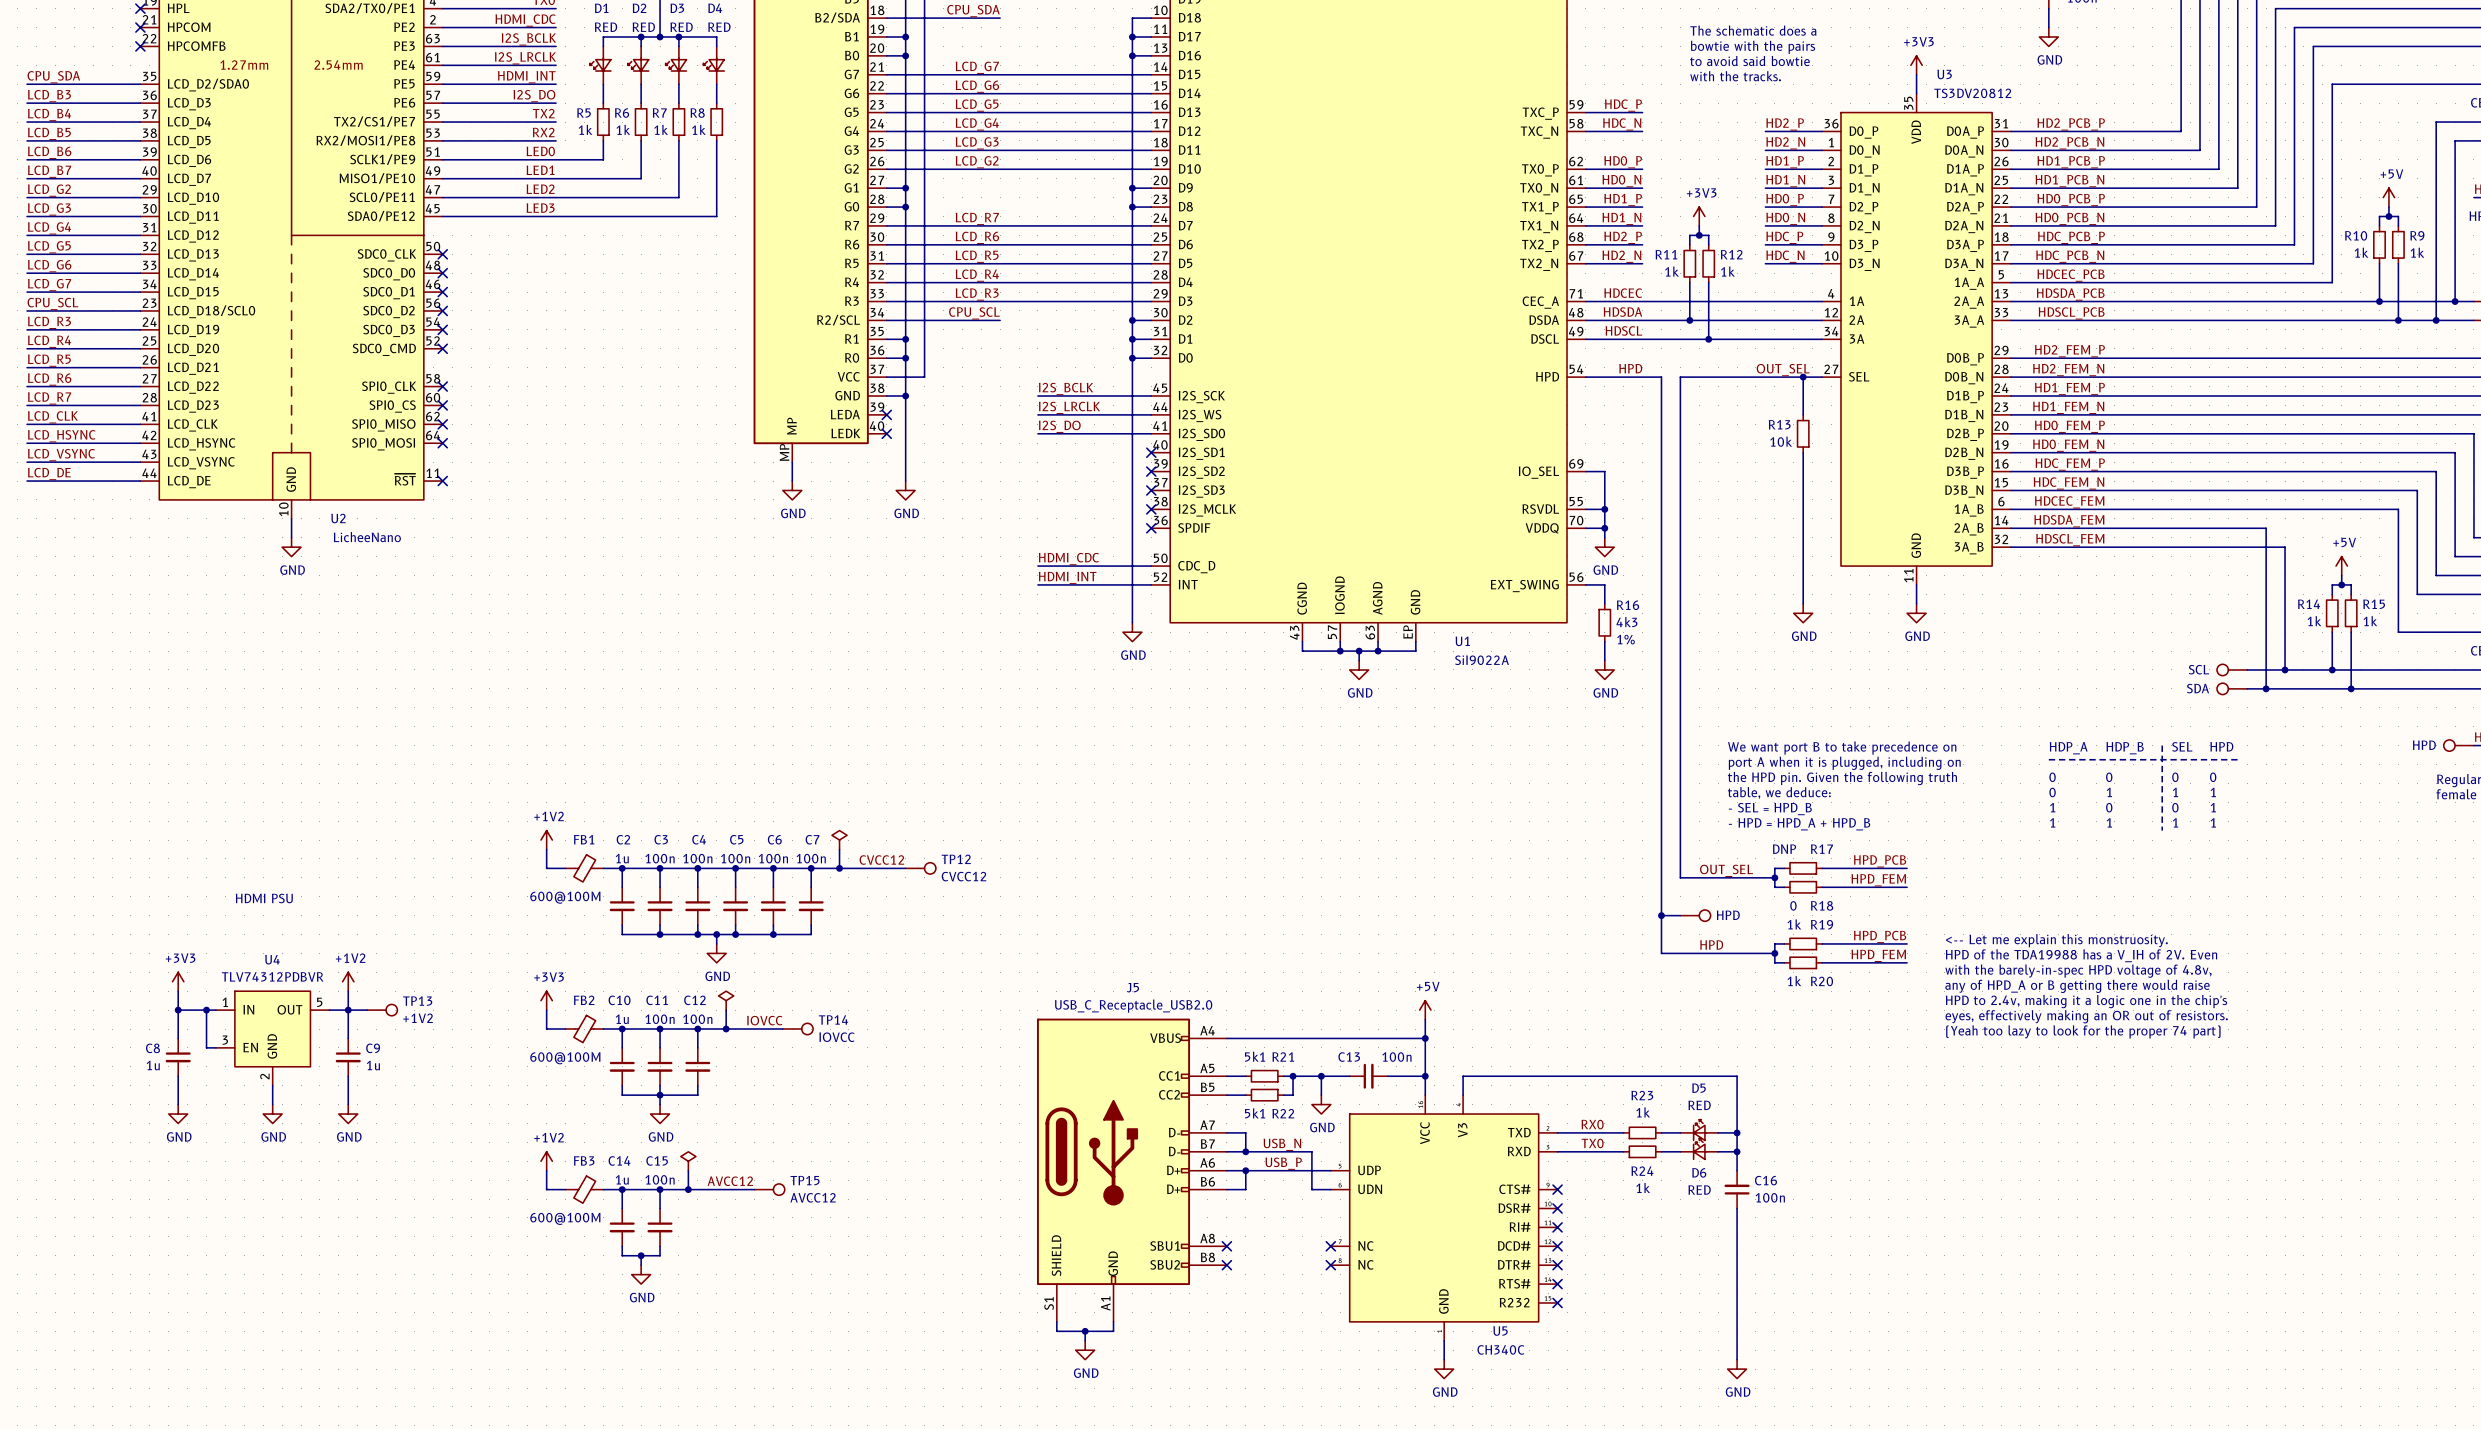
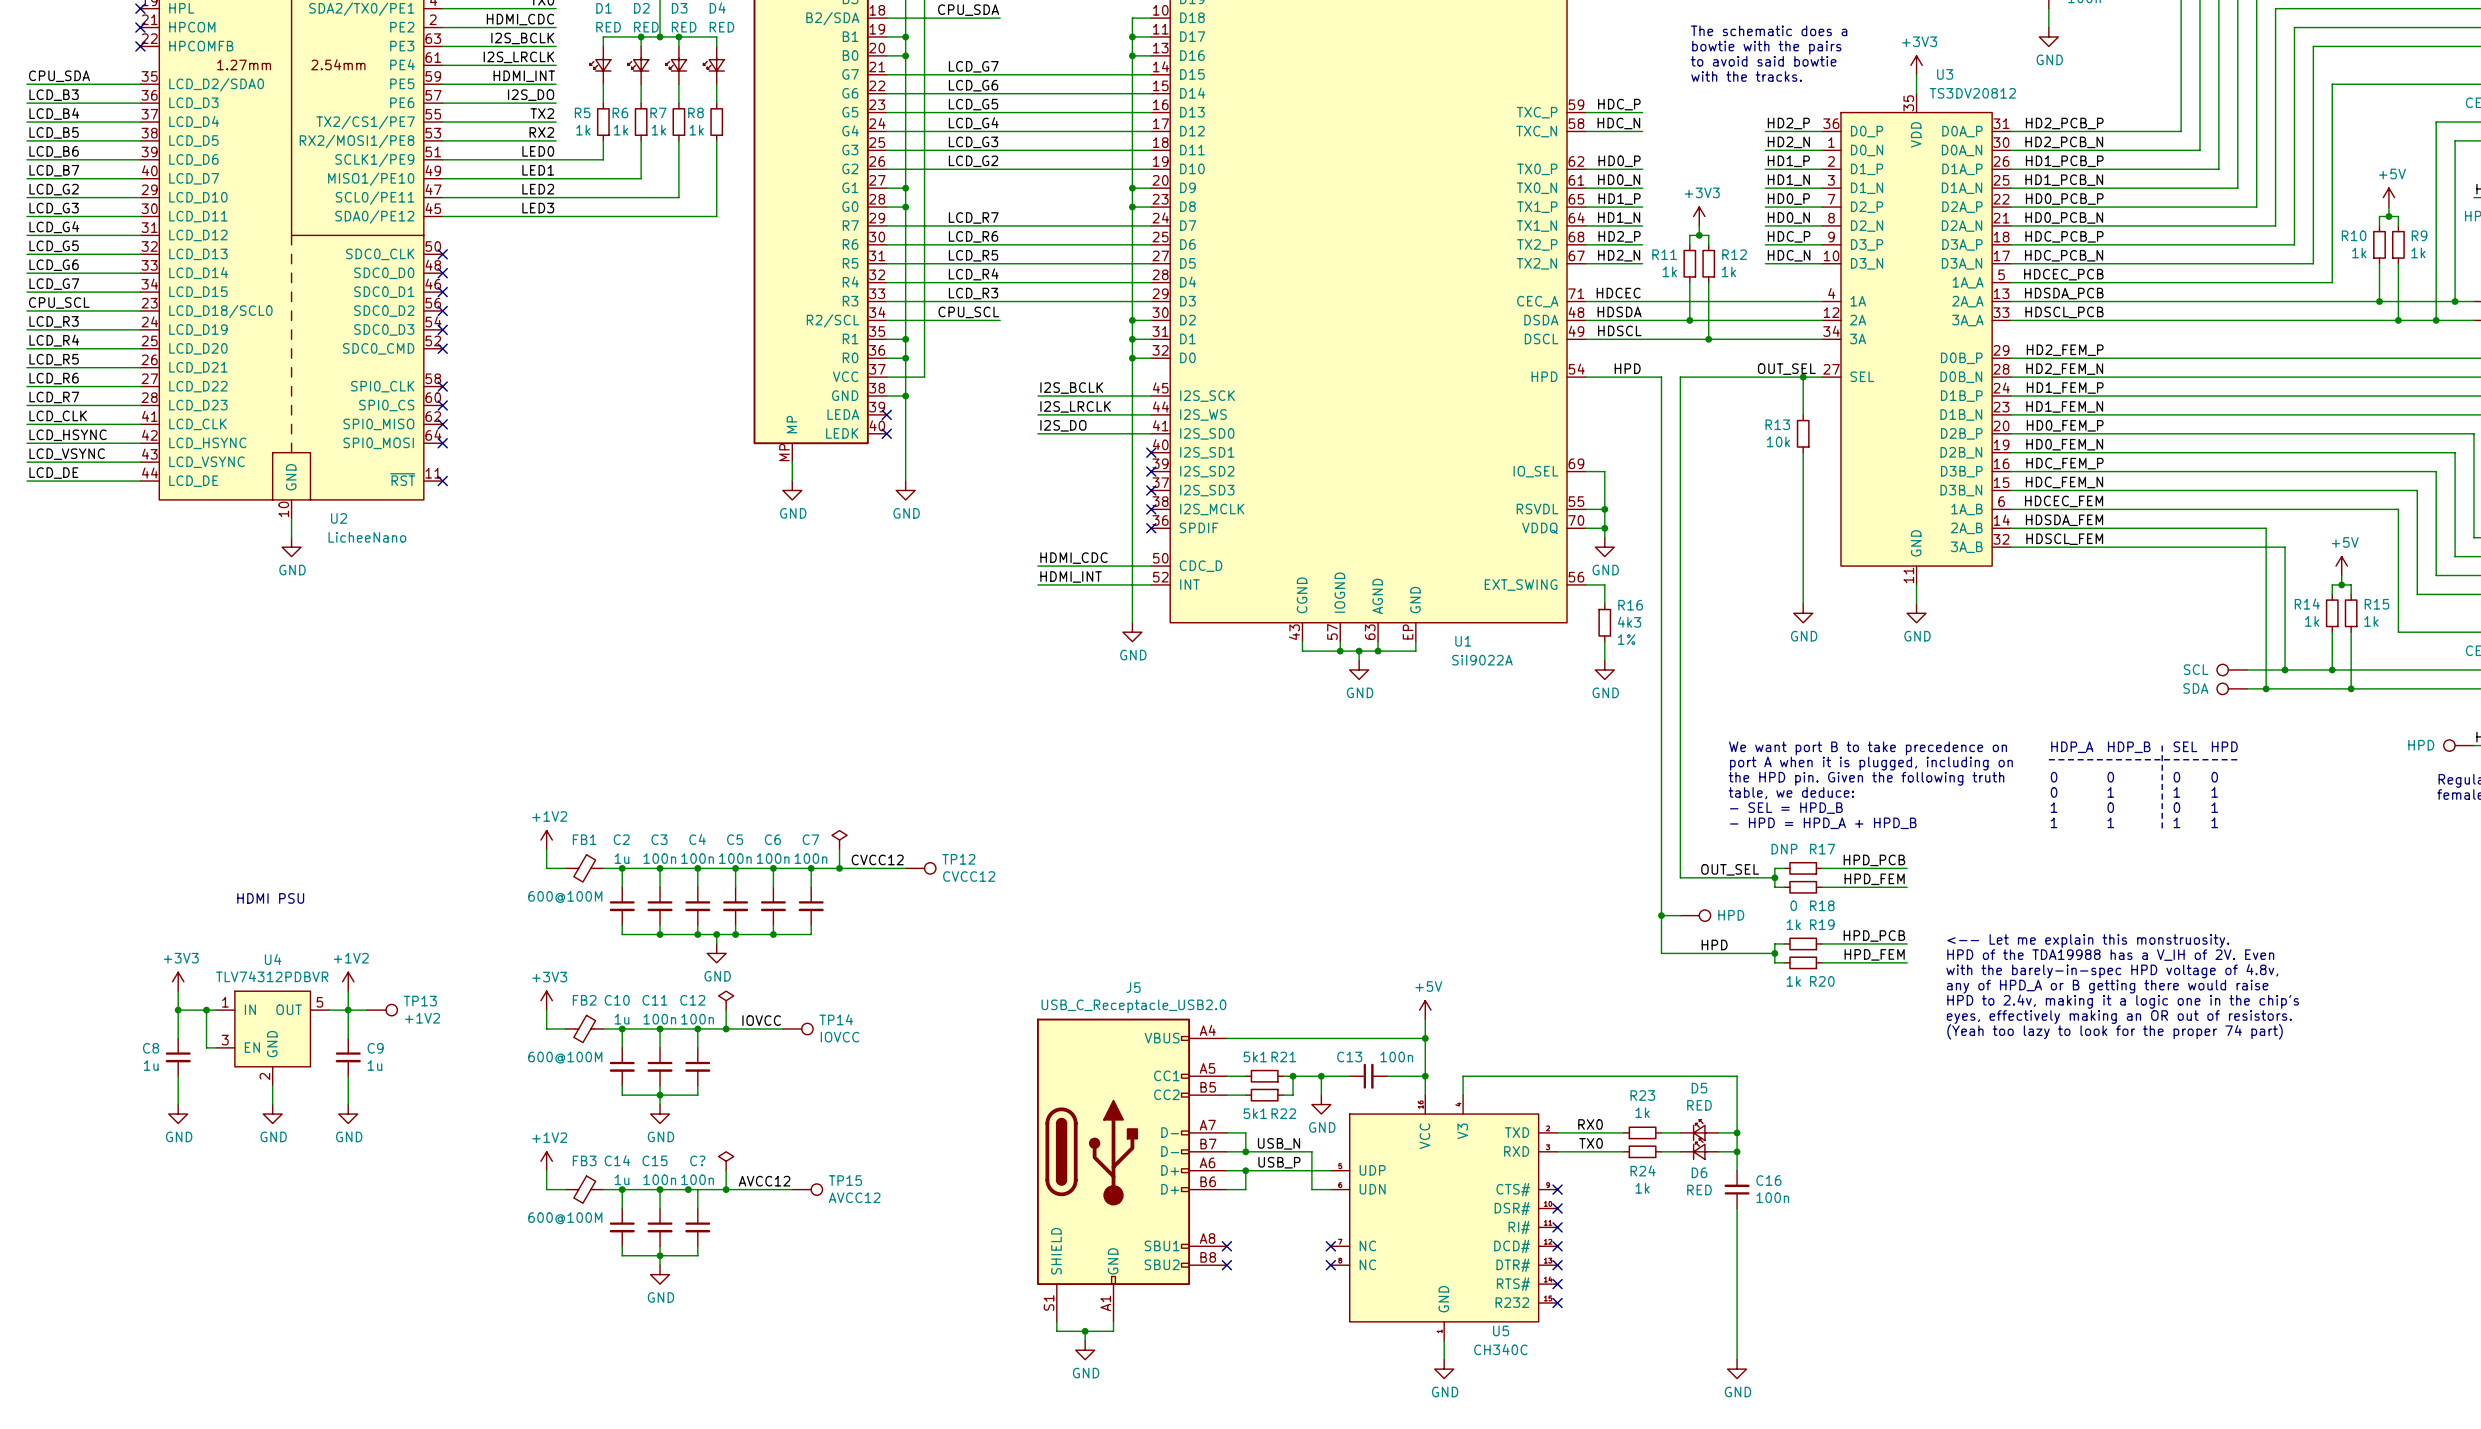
power symbol position: (688, 1161) -> (726, 1161)
wire: (688, 1170) (688, 1189) -> (697, 1189) (697, 1208)
wire: none -> (726, 1170) (726, 1189)
label position: AVCC12 (730, 1181) -> AVCC12 (764, 1181)
junction: none -> (726, 1189)
TP15 position: (769, 1189) -> (807, 1189)
C?: none -> 100n (697, 1227)
wire: none -> (697, 1246) (697, 1255) (660, 1255) (660, 1265)
wire: (641, 1255) (641, 1265) -> none
junction position: (641, 1255) -> (660, 1255)
power symbol position: GND (641, 1274) -> GND (660, 1274)

